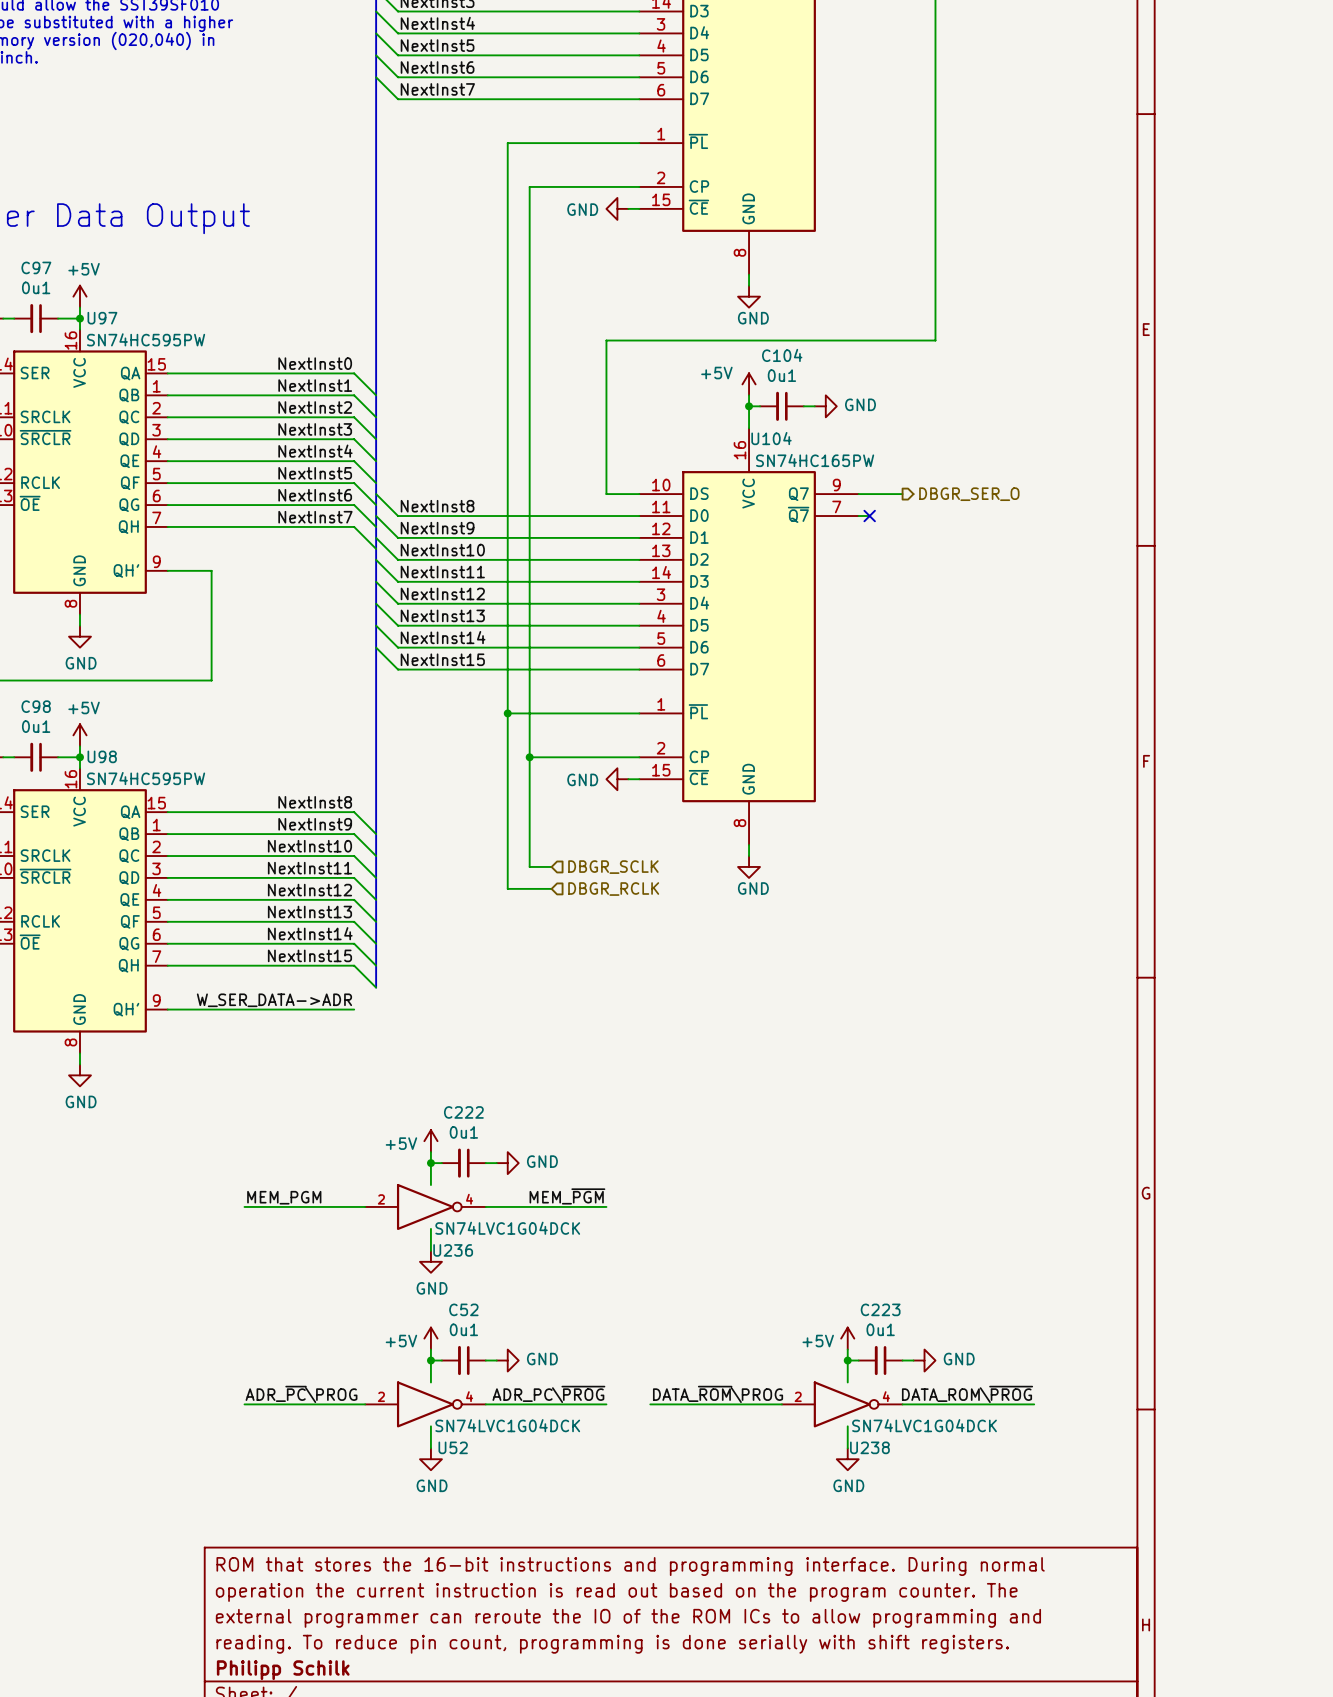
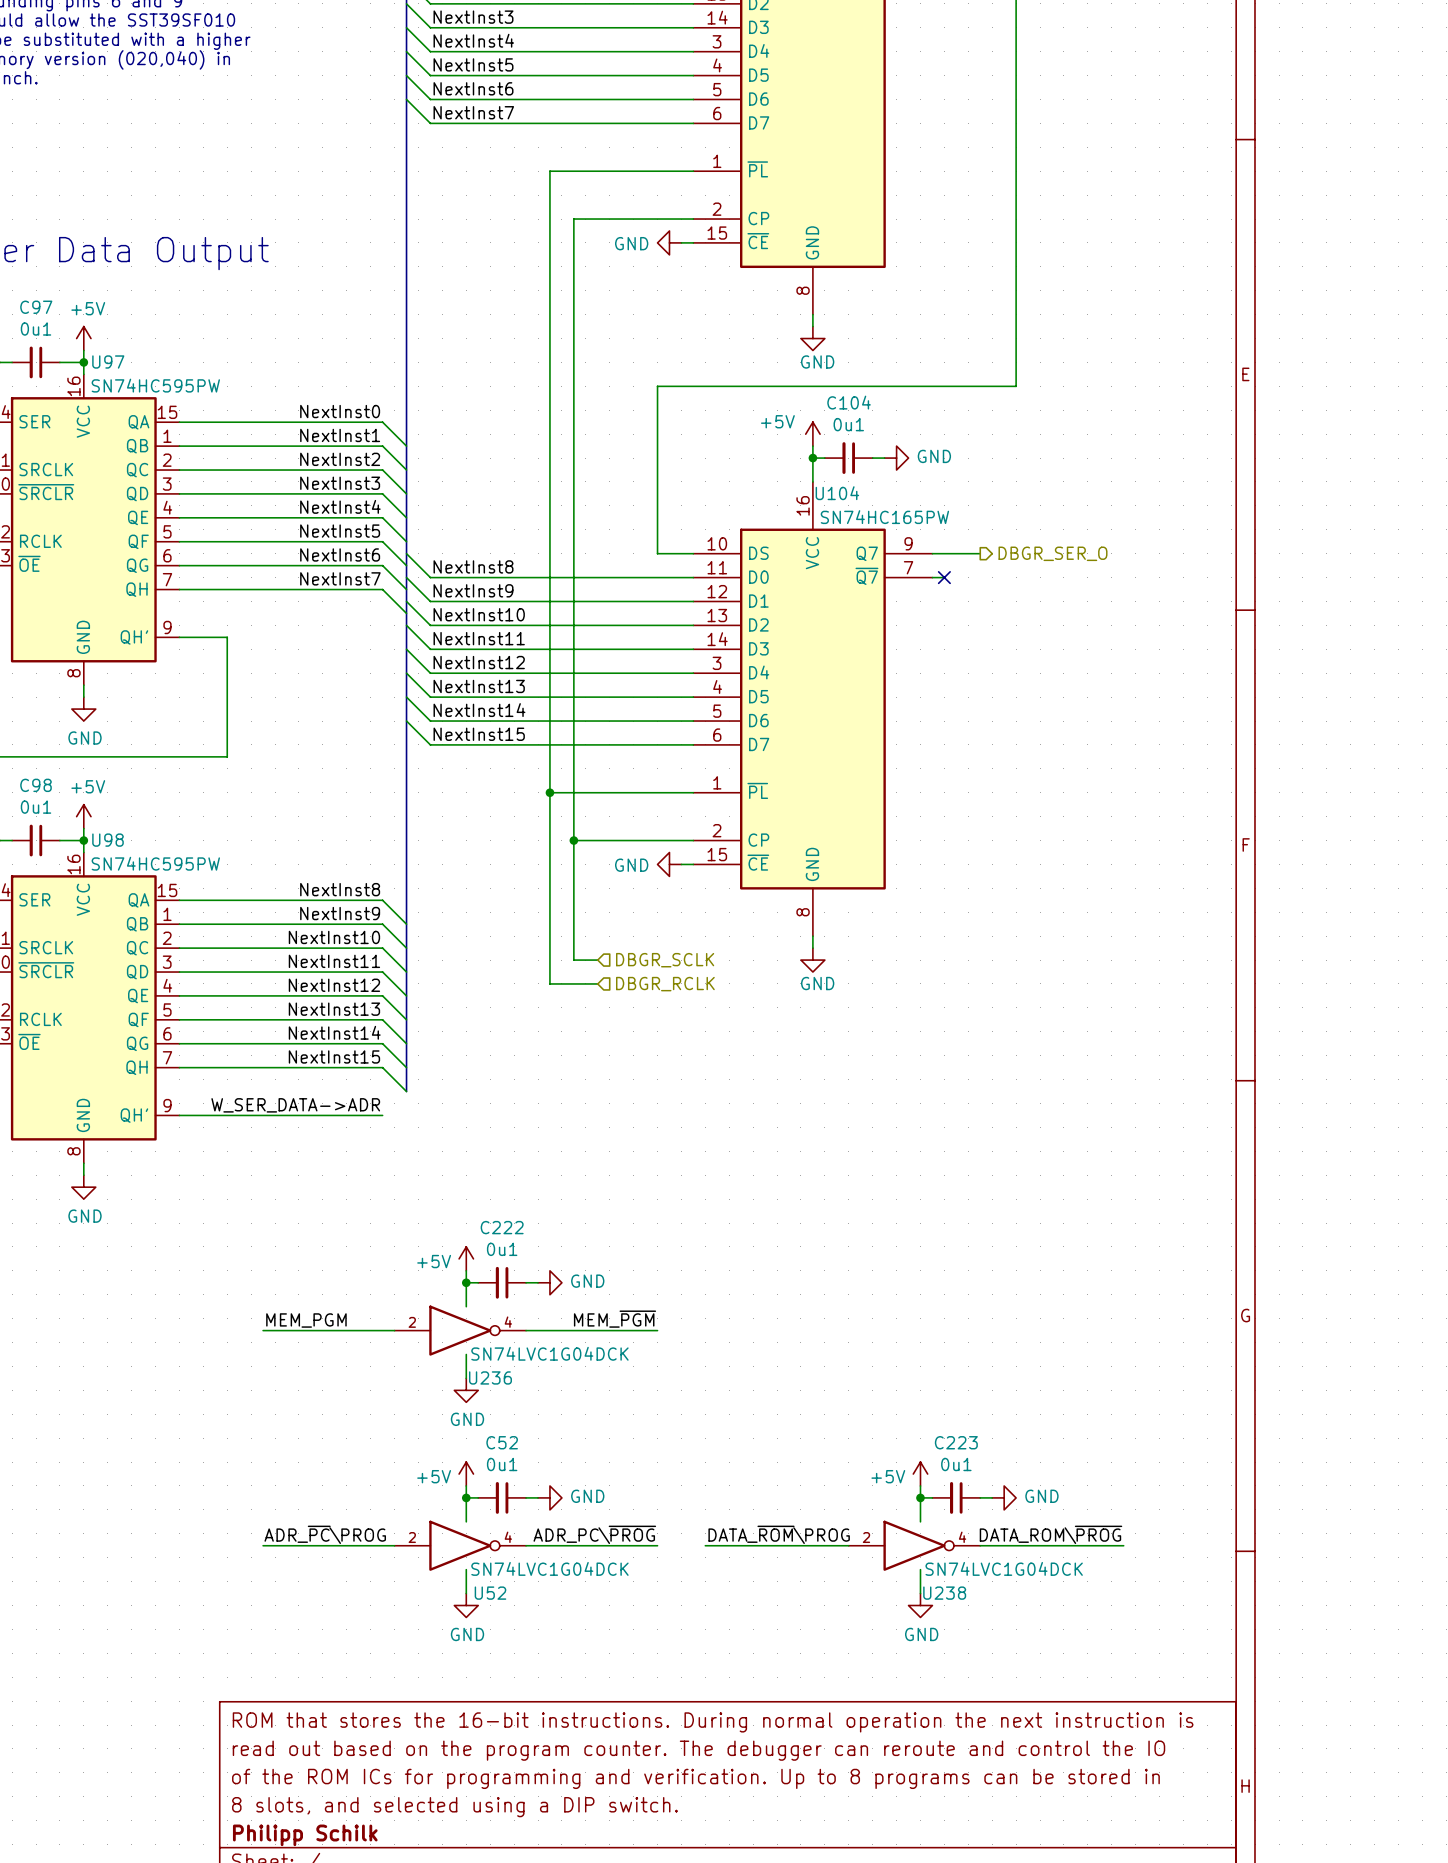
title block: ROM that stores the 16-bit instructions and programming interface. During normal (630, 1566) -> ROM that stores the 16-bit instructions. During normal operation the next instruction is (713, 1722)
title block: operation the current instruction is read out based on the program counter. The (616, 1592) -> read out based on the program counter. The debugger can reroute and control the IO (698, 1750)
title block: external programmer can reroute the IO of the ROM ICs to allow programming and (628, 1618) -> of the ROM ICs for programming and verification. Up to 8 programs can be stored in (695, 1778)
title block: reading. To reduce pin count, programming is done serially with shift registers. (612, 1644) -> 8 slots, and selected using a DIP switch. (454, 1807)

